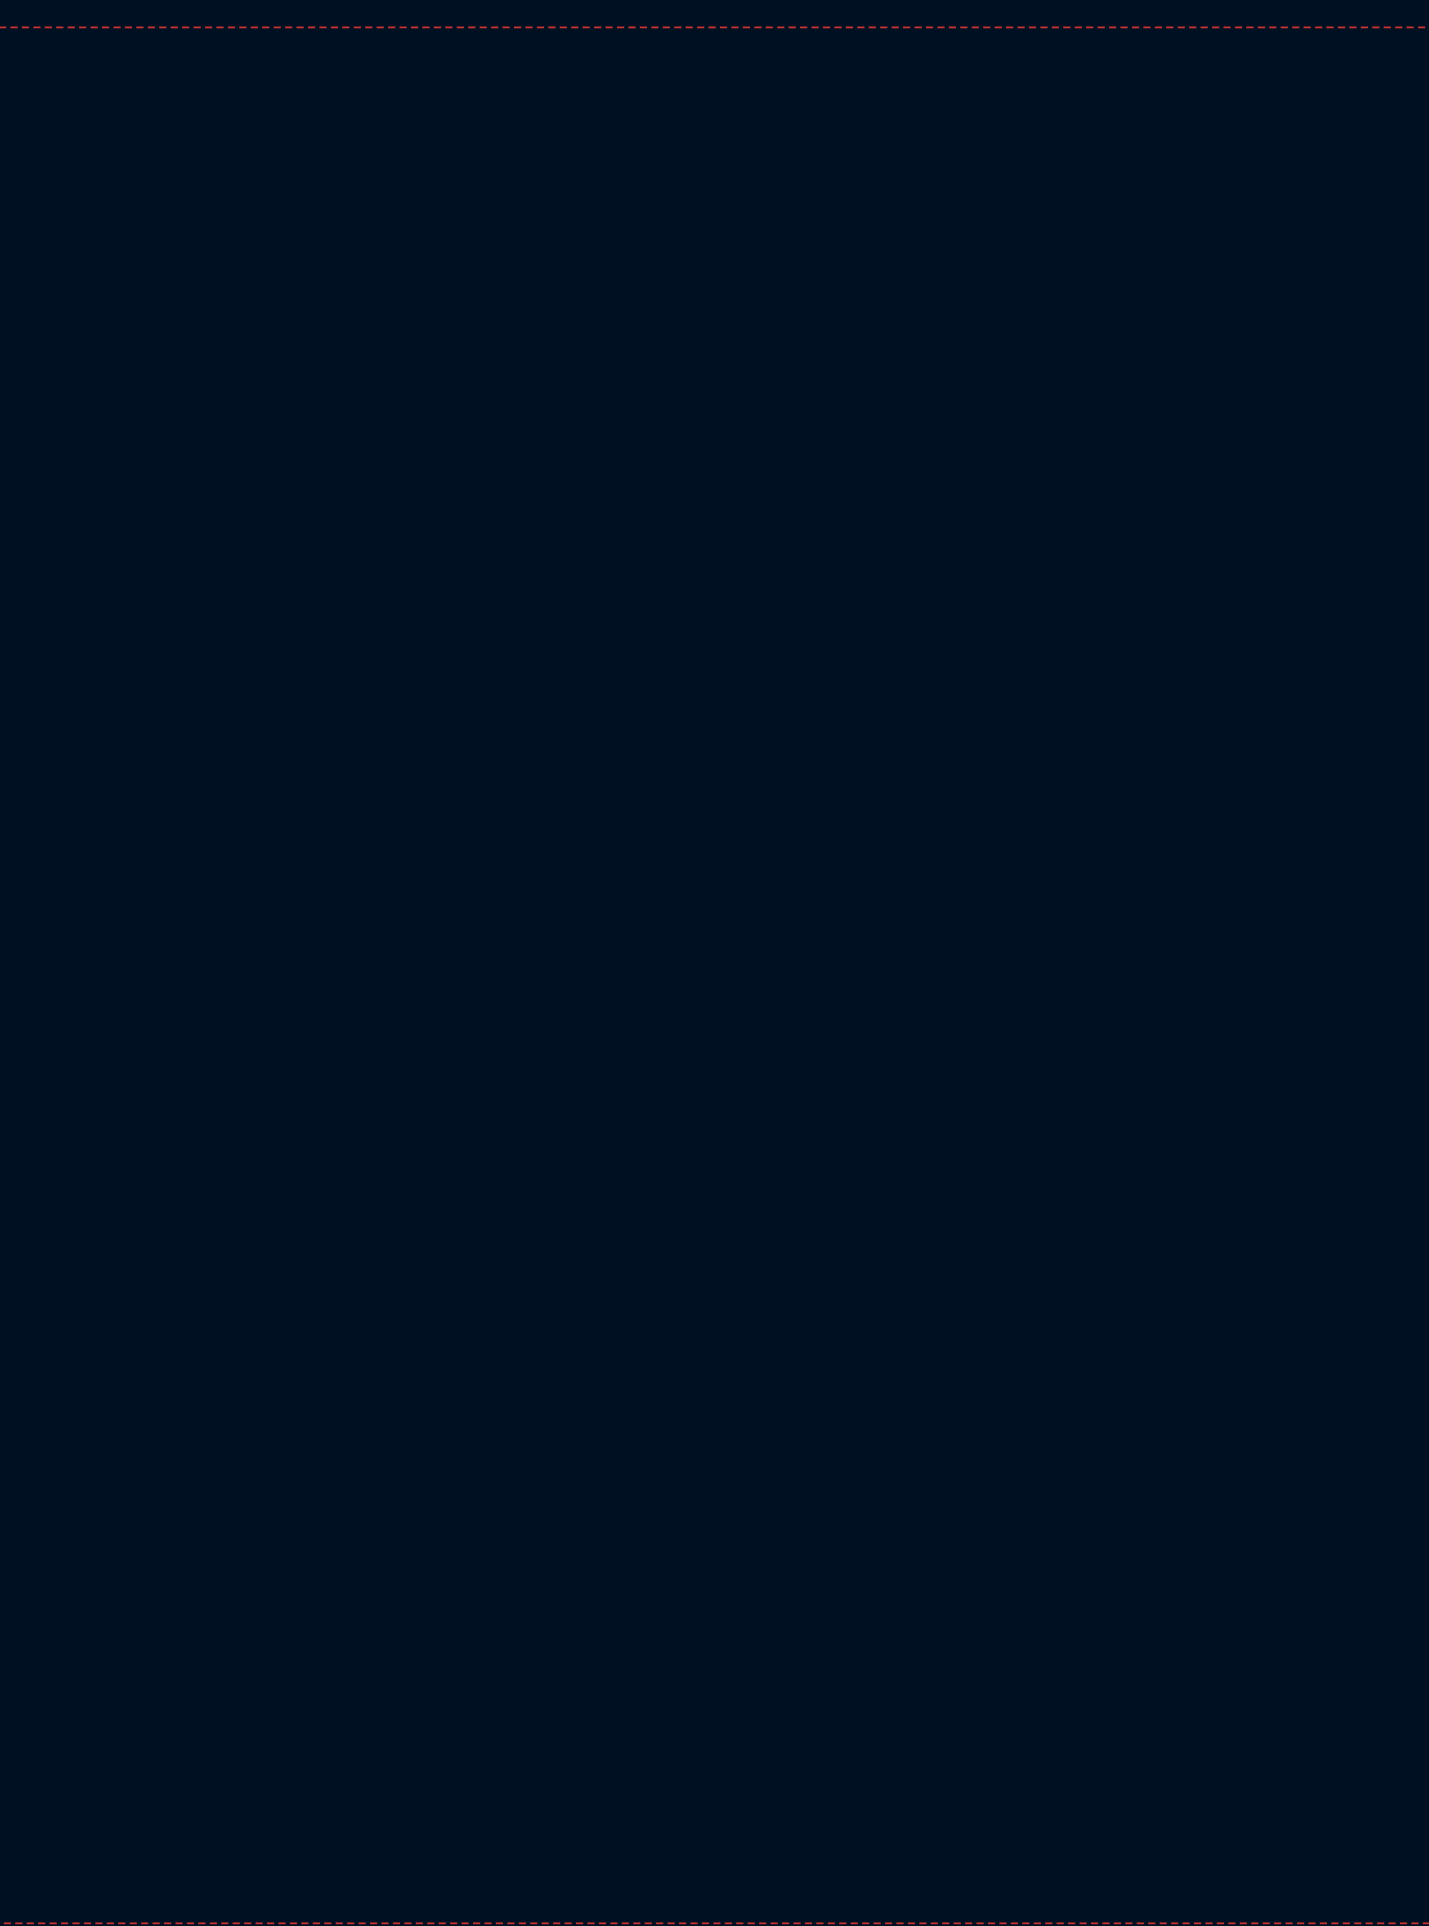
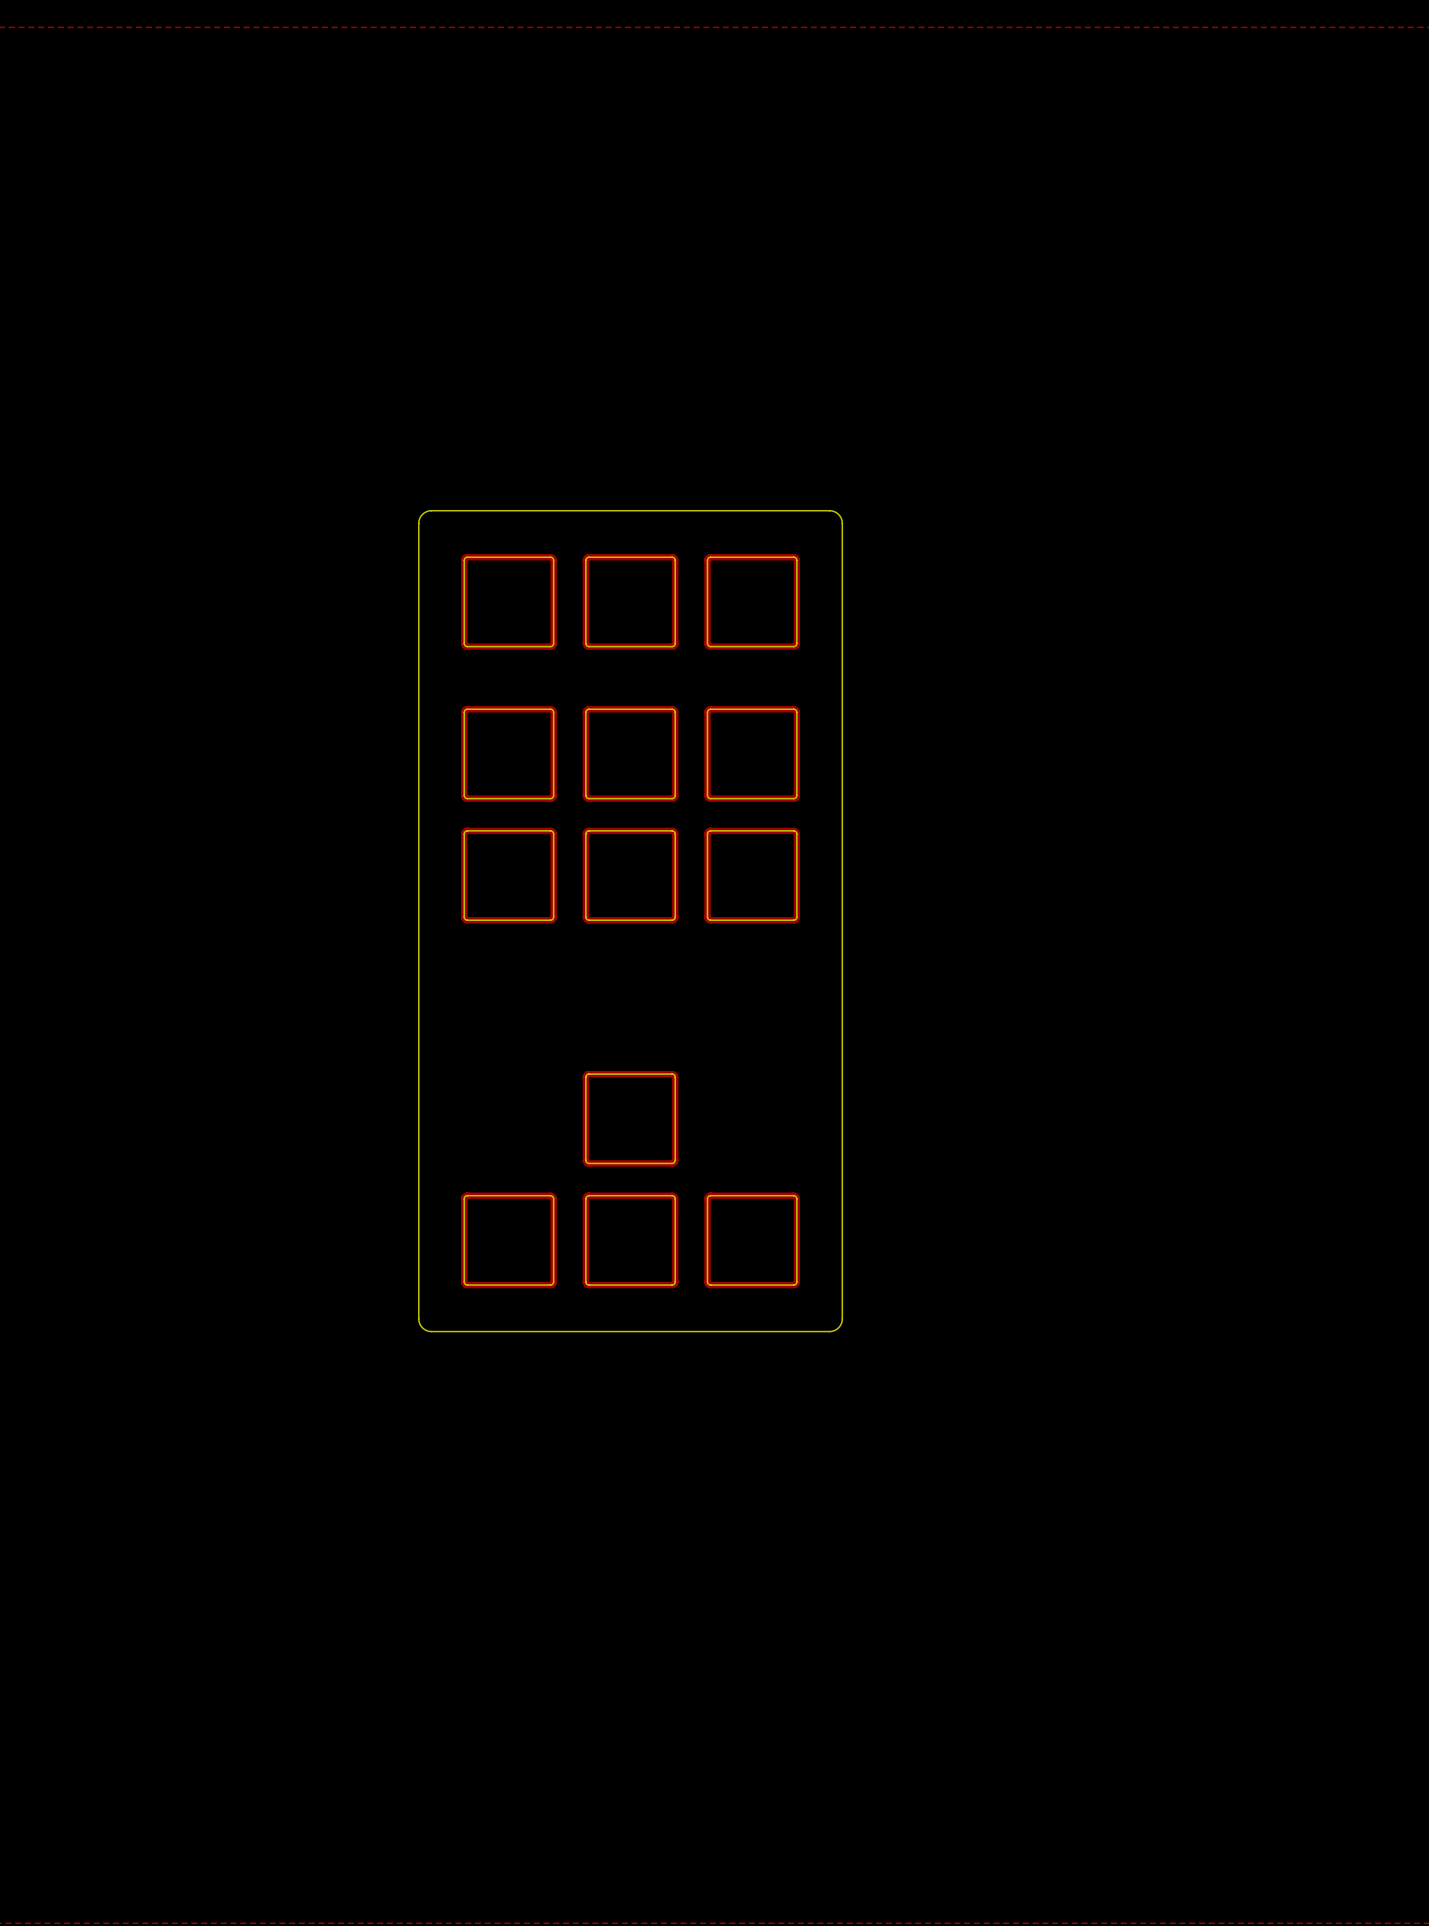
board edge: none -> (431, 510) (829, 510) (836, 512) (841, 517) (842, 1318) (840, 1325) (835, 1330) (431, 1331) (424, 1329) (420, 1324) (418, 523) (422, 514) (431, 510)
drawing: none -> [461, 554, 557, 650]
drawing: none -> [582, 554, 679, 650]
drawing: none -> [704, 554, 801, 650]
drawing: none -> [461, 706, 557, 802]
drawing: none -> [582, 706, 679, 802]
drawing: none -> [704, 706, 801, 802]
drawing: none -> [461, 827, 557, 924]
drawing: none -> [582, 827, 679, 924]
drawing: none -> [704, 827, 801, 924]
drawing: none -> [582, 1070, 679, 1167]
drawing: none -> [461, 1192, 557, 1289]
drawing: none -> [582, 1192, 679, 1289]
drawing: none -> [704, 1192, 801, 1289]

